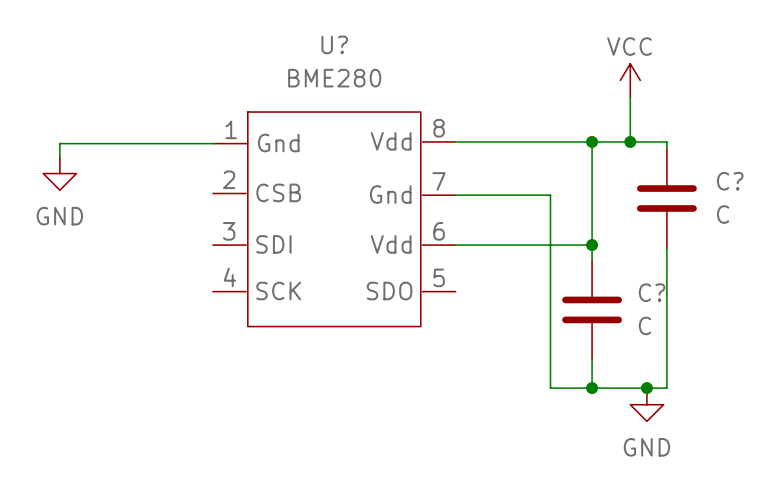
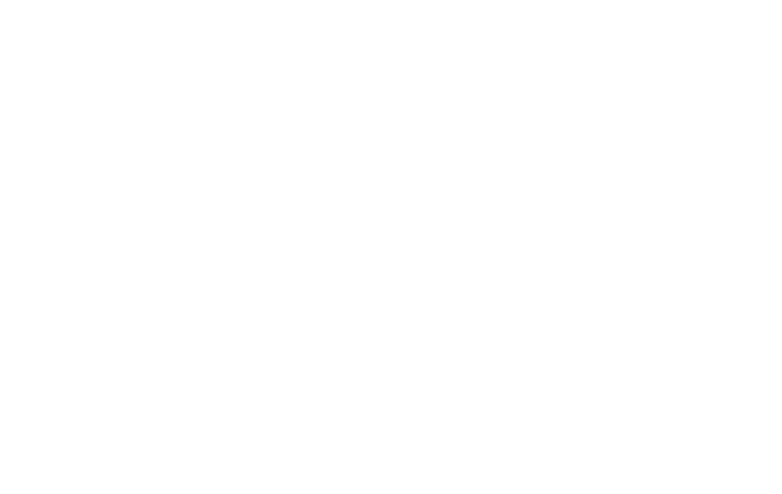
power symbol: VCC (630, 80) -> none
wire: (630, 97) (630, 141) -> none
wire: (455, 141) (666, 141) (666, 148) -> none
wire: (592, 141) (592, 260) -> none
junction: (592, 141) -> none
junction: (630, 141) -> none
wire: (214, 143) (59, 143) (59, 156) -> none
power symbol: GND (59, 173) -> none
wire: (455, 195) (550, 195) (550, 388) (666, 388) (666, 248) -> none
C?: C (666, 198) -> none
U?: BME280 (334, 219) -> none
wire: (455, 245) (592, 245) -> none
junction: (592, 245) -> none
C?: C (592, 309) -> none
wire: (592, 359) (592, 388) -> none
junction: (592, 388) -> none
junction: (646, 388) -> none
power symbol: GND (646, 404) -> none

